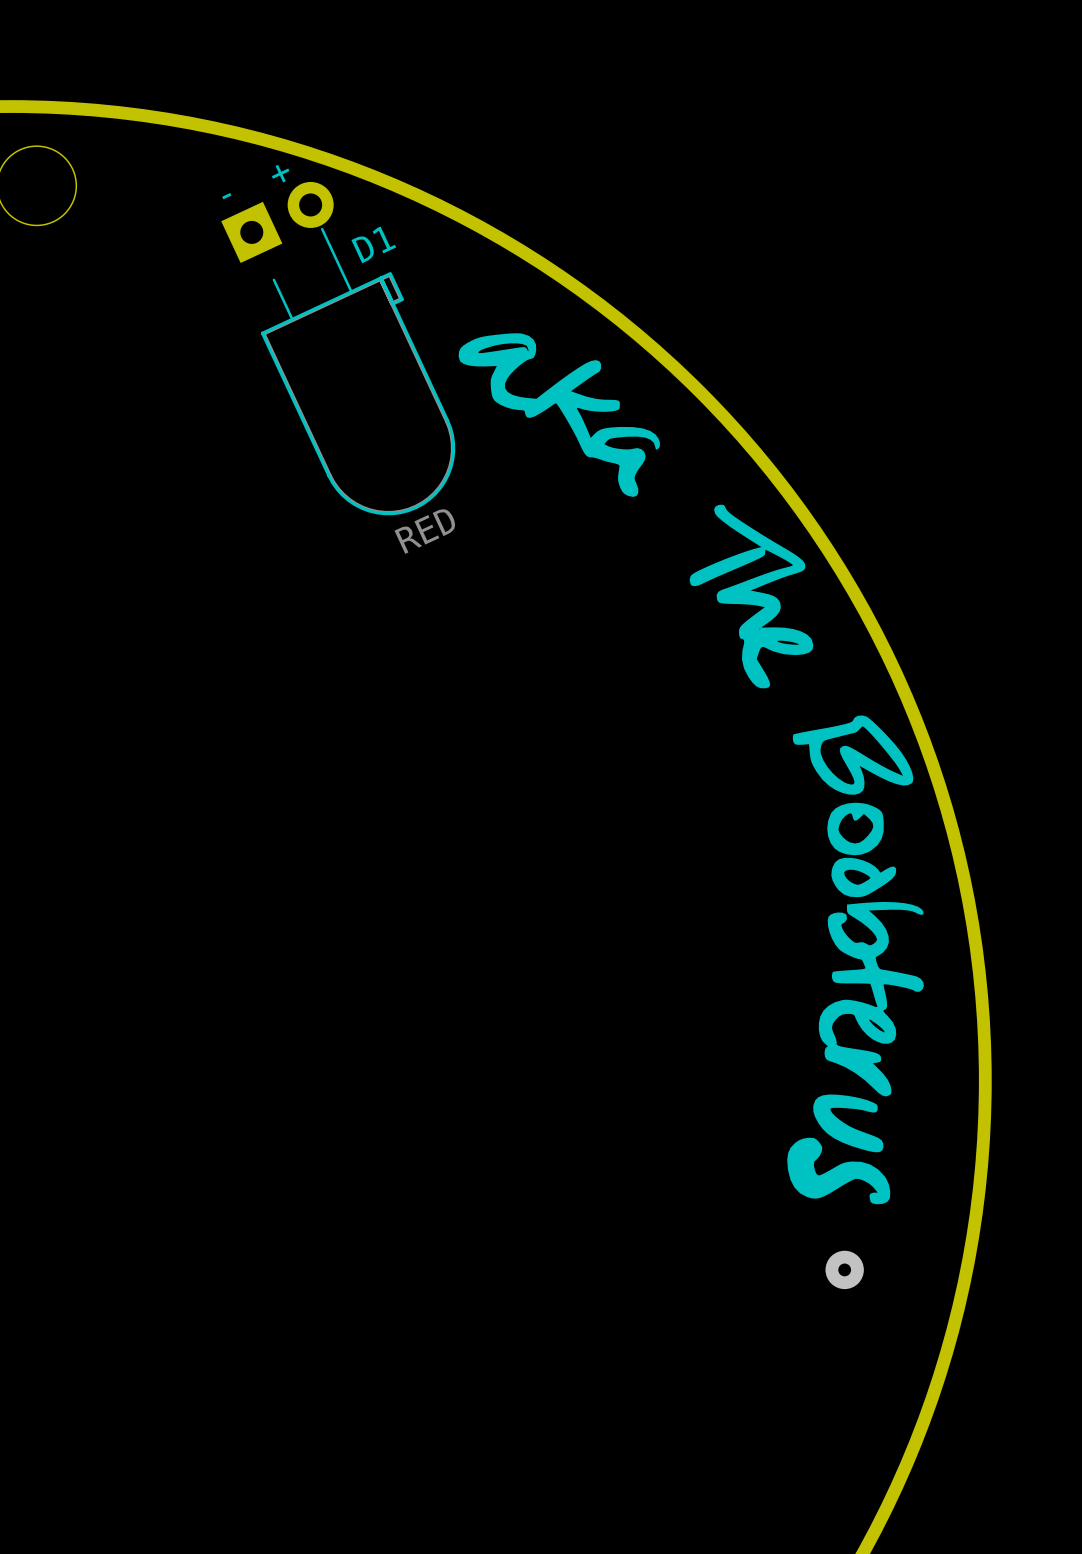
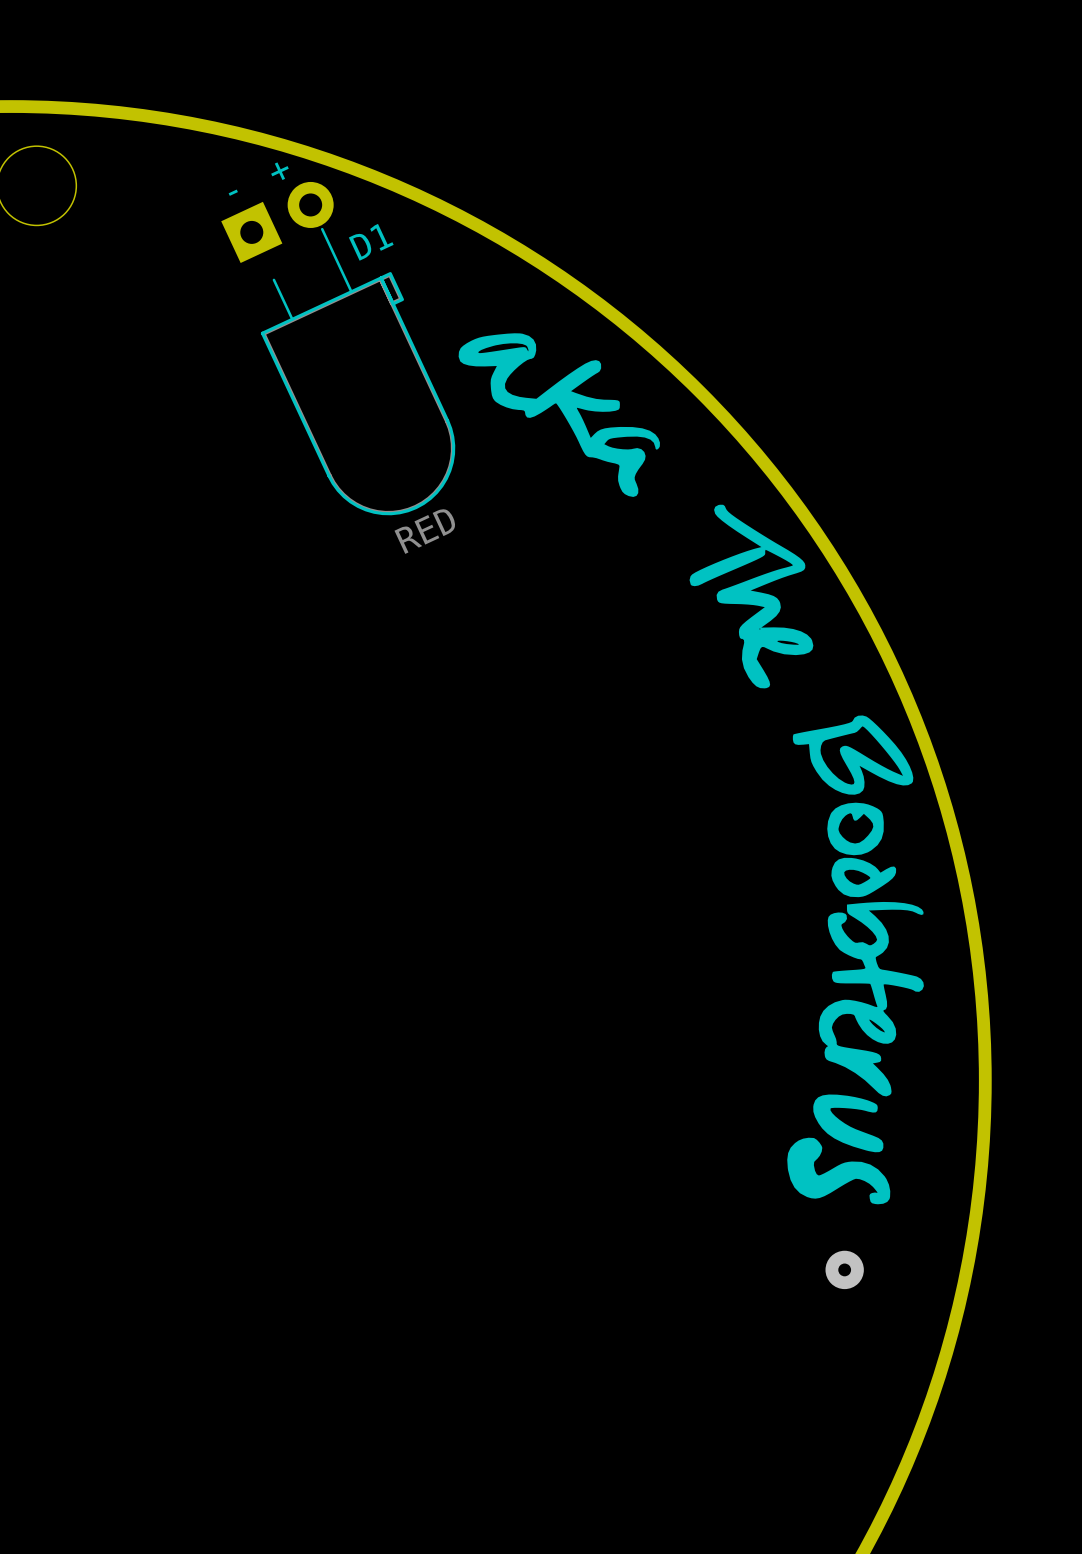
D1 text: none -> + (279, 171)
D1 footprint: [221, 181, 456, 516] -> [221, 181, 456, 516]
D1 text: none -> - (233, 192)

